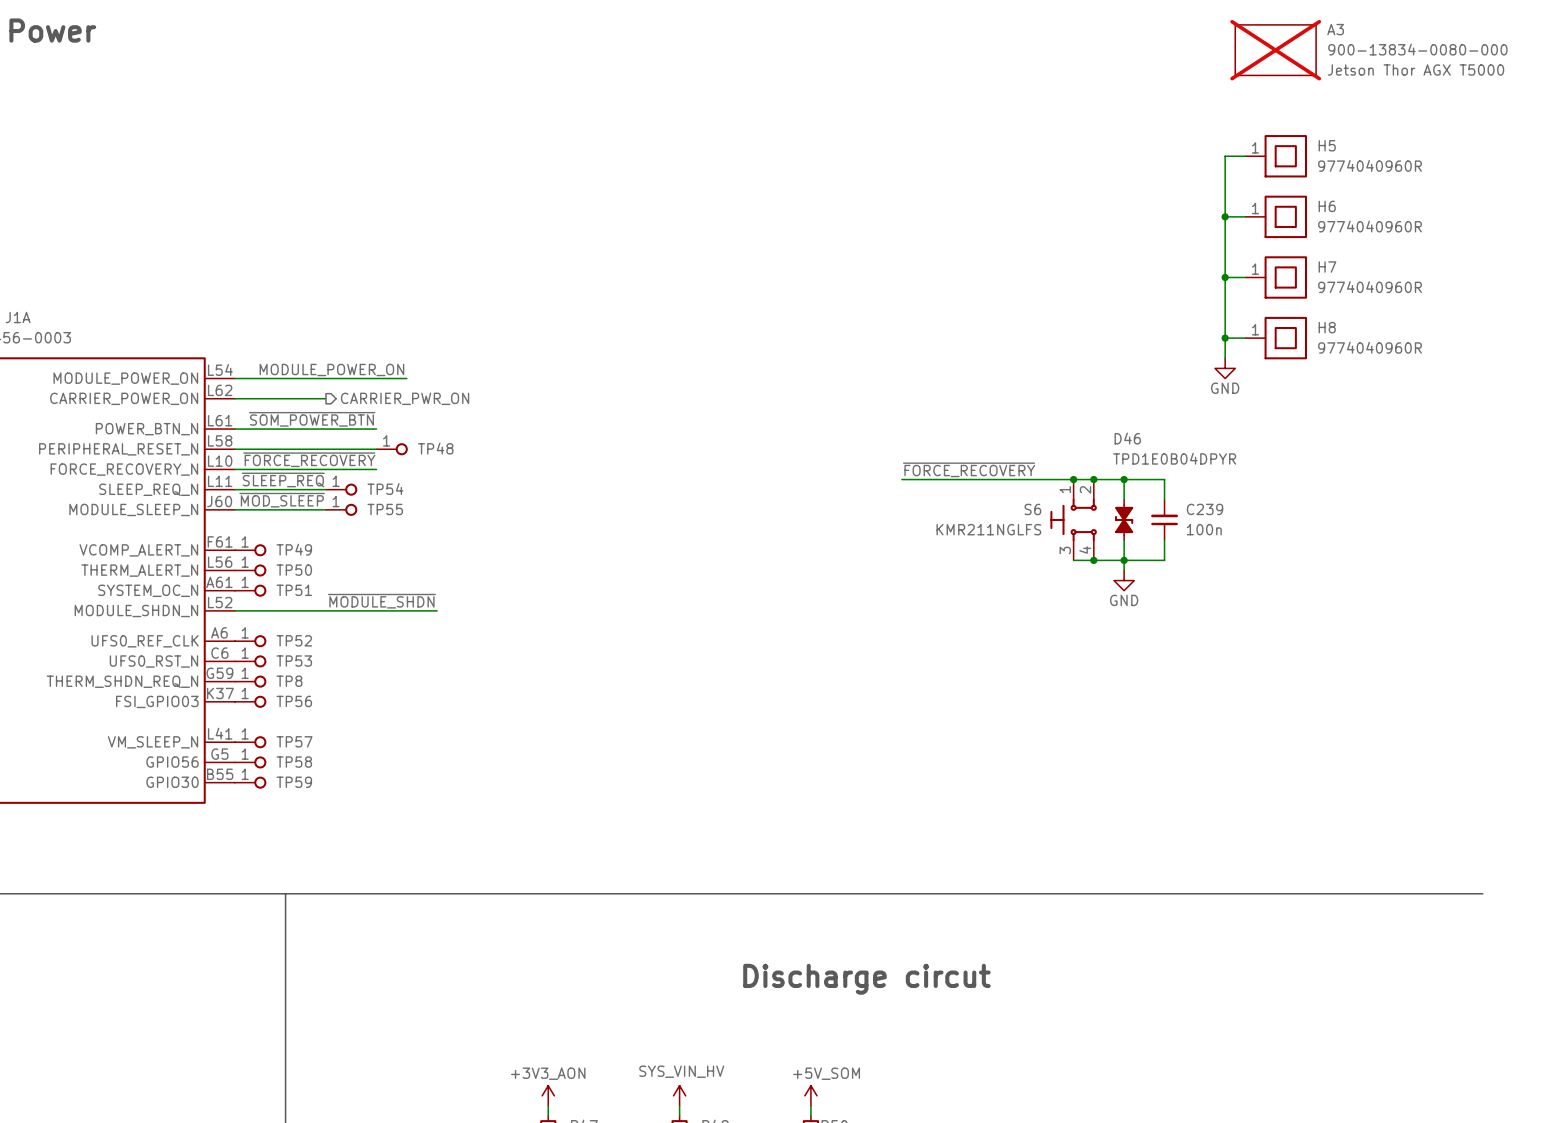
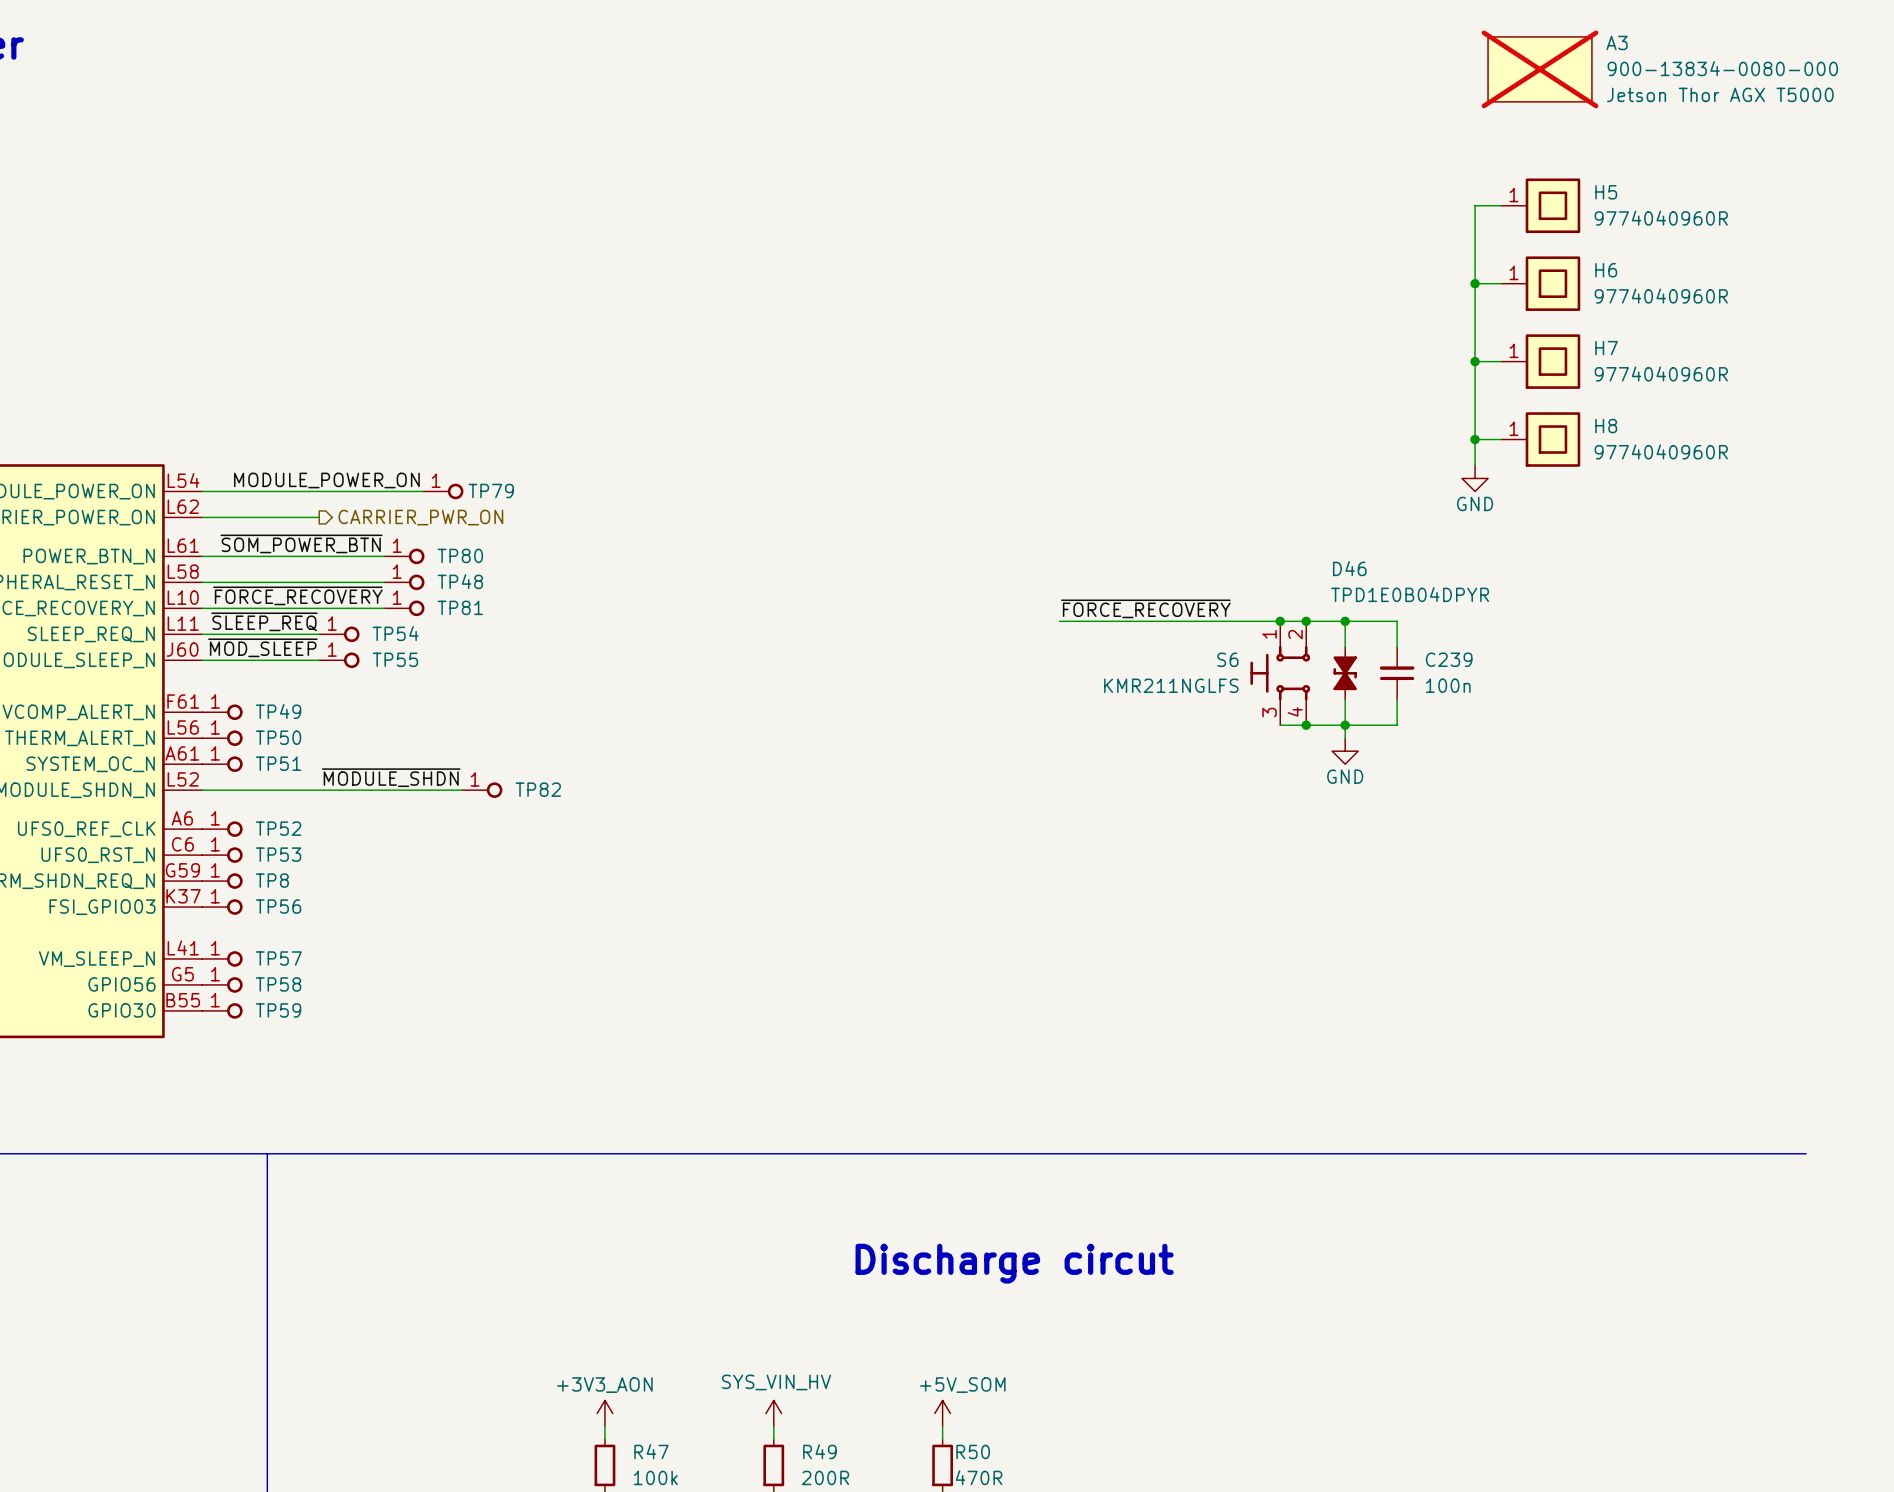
TP79: none -> (443, 491)
TP80: none -> (404, 556)
TP81: none -> (404, 608)
TP82: none -> (482, 790)

